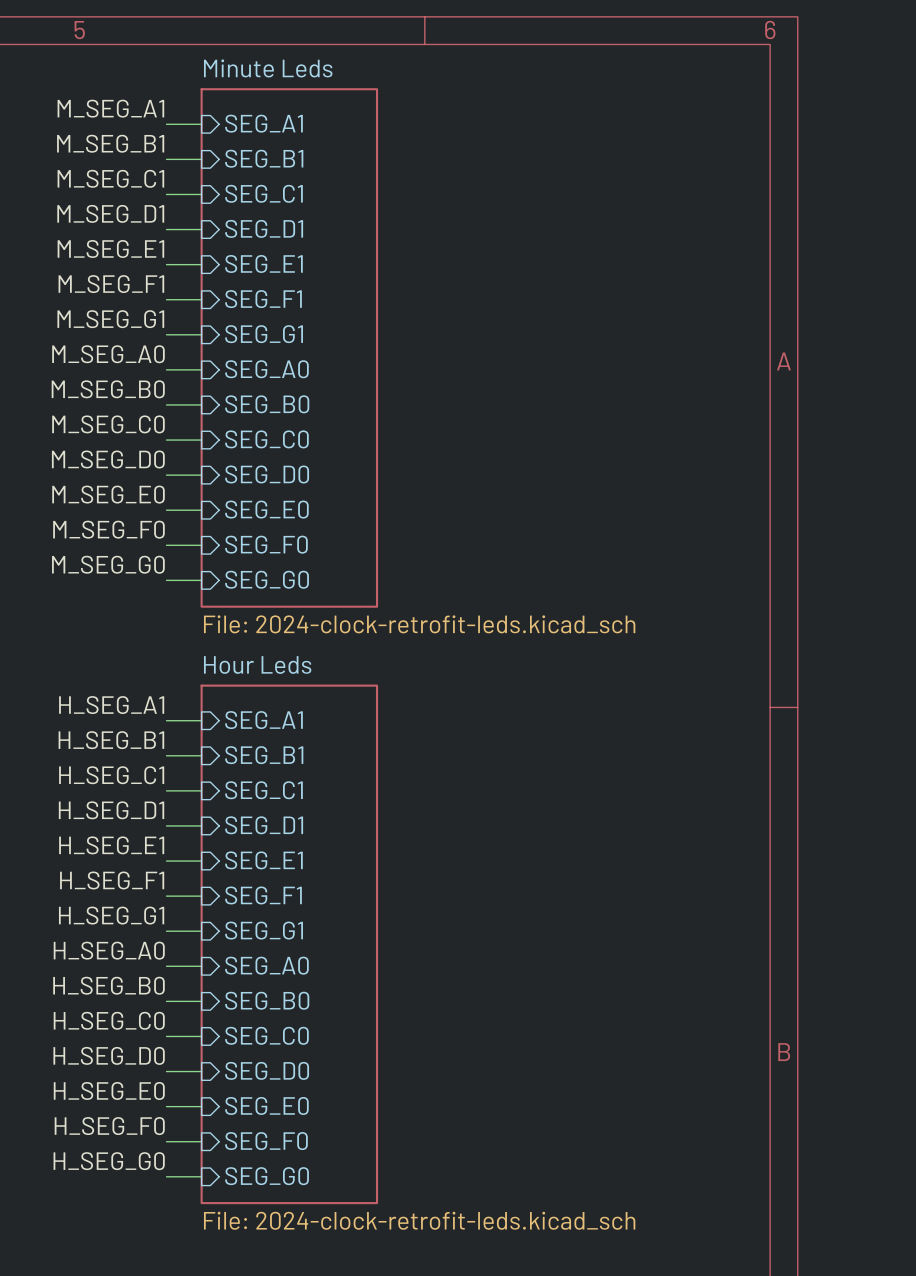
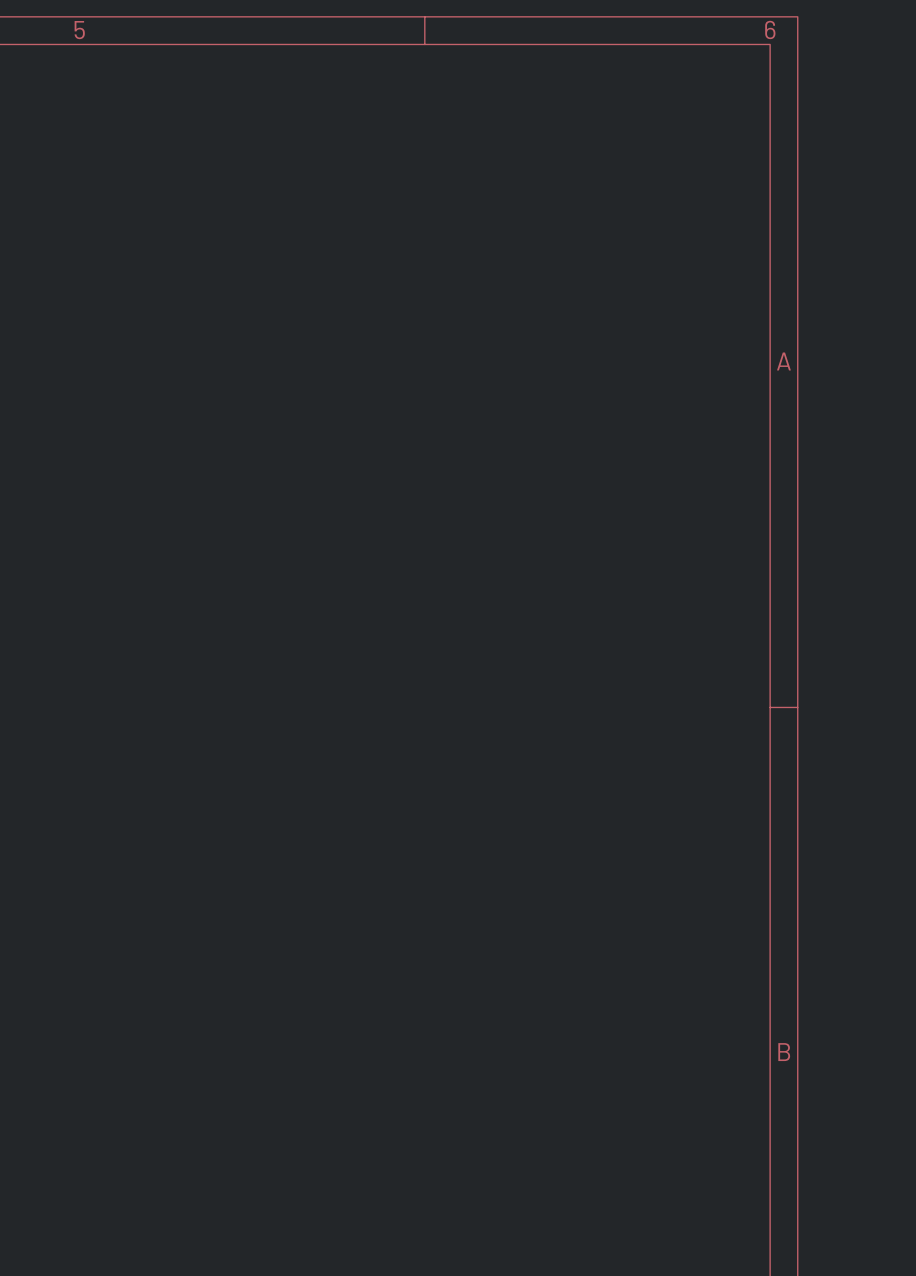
label: M_SEG_A1 (110, 108) -> none
sheet pin: SEG_A1 (264, 123) -> none
wire: (166, 124) (201, 124) -> none
label: M_SEG_B1 (110, 143) -> none
sheet pin: SEG_B1 (264, 158) -> none
wire: (166, 159) (201, 159) -> none
label: M_SEG_C1 (110, 178) -> none
sheet pin: SEG_C1 (264, 193) -> none
wire: (166, 194) (201, 194) -> none
label: M_SEG_D1 (110, 213) -> none
sheet pin: SEG_D1 (264, 228) -> none
wire: (166, 229) (201, 229) -> none
label: M_SEG_E1 (110, 248) -> none
sheet pin: SEG_E1 (263, 263) -> none
wire: (166, 264) (201, 264) -> none
label: M_SEG_F1 (111, 284) -> none
wire: (166, 299) (201, 299) -> none
sheet pin: SEG_F1 (263, 299) -> none
label: M_SEG_G1 (110, 319) -> none
wire: (166, 334) (201, 334) -> none
sheet pin: SEG_G1 (264, 334) -> none
sheet Minute Leds: File: 2024-clock-retrofit-leds.kicad_sch (289, 347) -> none
label: M_SEG_A0 (108, 354) -> none
wire: (166, 369) (201, 369) -> none
sheet pin: SEG_A0 (266, 369) -> none
label: M_SEG_B0 (108, 389) -> none
wire: (166, 404) (201, 404) -> none
sheet pin: SEG_B0 (267, 404) -> none
label: M_SEG_C0 (108, 424) -> none
sheet pin: SEG_C0 (266, 439) -> none
wire: (166, 440) (201, 440) -> none
label: M_SEG_D0 (108, 459) -> none
sheet pin: SEG_D0 (267, 474) -> none
wire: (166, 475) (201, 475) -> none
label: M_SEG_E0 (108, 494) -> none
sheet pin: SEG_E0 (266, 509) -> none
wire: (166, 510) (201, 510) -> none
label: M_SEG_F0 (108, 529) -> none
sheet pin: SEG_F0 (266, 544) -> none
wire: (166, 545) (201, 545) -> none
label: M_SEG_G0 (108, 564) -> none
sheet pin: SEG_G0 (267, 579) -> none
wire: (166, 580) (201, 580) -> none
label: H_SEG_A1 (111, 705) -> none
wire: (166, 720) (201, 720) -> none
sheet pin: SEG_A1 (264, 720) -> none
label: H_SEG_B1 (111, 740) -> none
wire: (166, 755) (201, 755) -> none
sheet pin: SEG_B1 (264, 755) -> none
label: H_SEG_C1 (111, 775) -> none
wire: (166, 790) (201, 790) -> none
sheet pin: SEG_C1 (264, 790) -> none
label: H_SEG_D1 (111, 810) -> none
wire: (166, 825) (201, 825) -> none
sheet pin: SEG_D1 (264, 825) -> none
label: H_SEG_E1 (111, 845) -> none
sheet pin: SEG_E1 (263, 860) -> none
wire: (166, 861) (201, 861) -> none
label: H_SEG_F1 (112, 880) -> none
sheet pin: SEG_F1 (263, 895) -> none
wire: (166, 896) (201, 896) -> none
label: H_SEG_G1 (111, 915) -> none
sheet pin: SEG_G1 (264, 930) -> none
wire: (166, 931) (201, 931) -> none
sheet Hour Leds: File: 2024-clock-retrofit-leds.kicad_sch (289, 944) -> none
label: H_SEG_A0 (109, 950) -> none
sheet pin: SEG_A0 (266, 965) -> none
wire: (166, 966) (201, 966) -> none
label: H_SEG_B0 (108, 985) -> none
sheet pin: SEG_B0 (267, 1000) -> none
wire: (166, 1001) (201, 1001) -> none
label: H_SEG_C0 (109, 1020) -> none
sheet pin: SEG_C0 (266, 1035) -> none
wire: (166, 1036) (201, 1036) -> none
label: H_SEG_D0 (109, 1055) -> none
sheet pin: SEG_D0 (267, 1070) -> none
wire: (166, 1071) (201, 1071) -> none
label: H_SEG_E0 (109, 1090) -> none
sheet pin: SEG_E0 (266, 1105) -> none
wire: (166, 1106) (201, 1106) -> none
label: H_SEG_F0 (109, 1126) -> none
wire: (166, 1141) (201, 1141) -> none
sheet pin: SEG_F0 (266, 1141) -> none
label: H_SEG_G0 (109, 1161) -> none
wire: (166, 1176) (201, 1176) -> none
sheet pin: SEG_G0 (267, 1176) -> none

